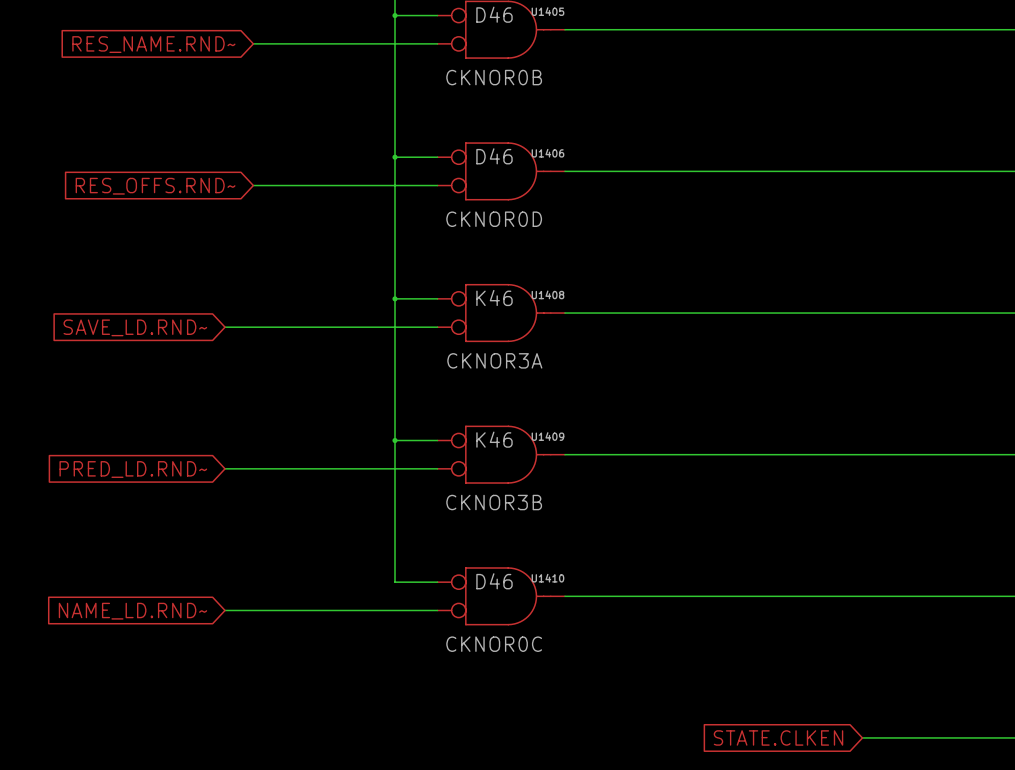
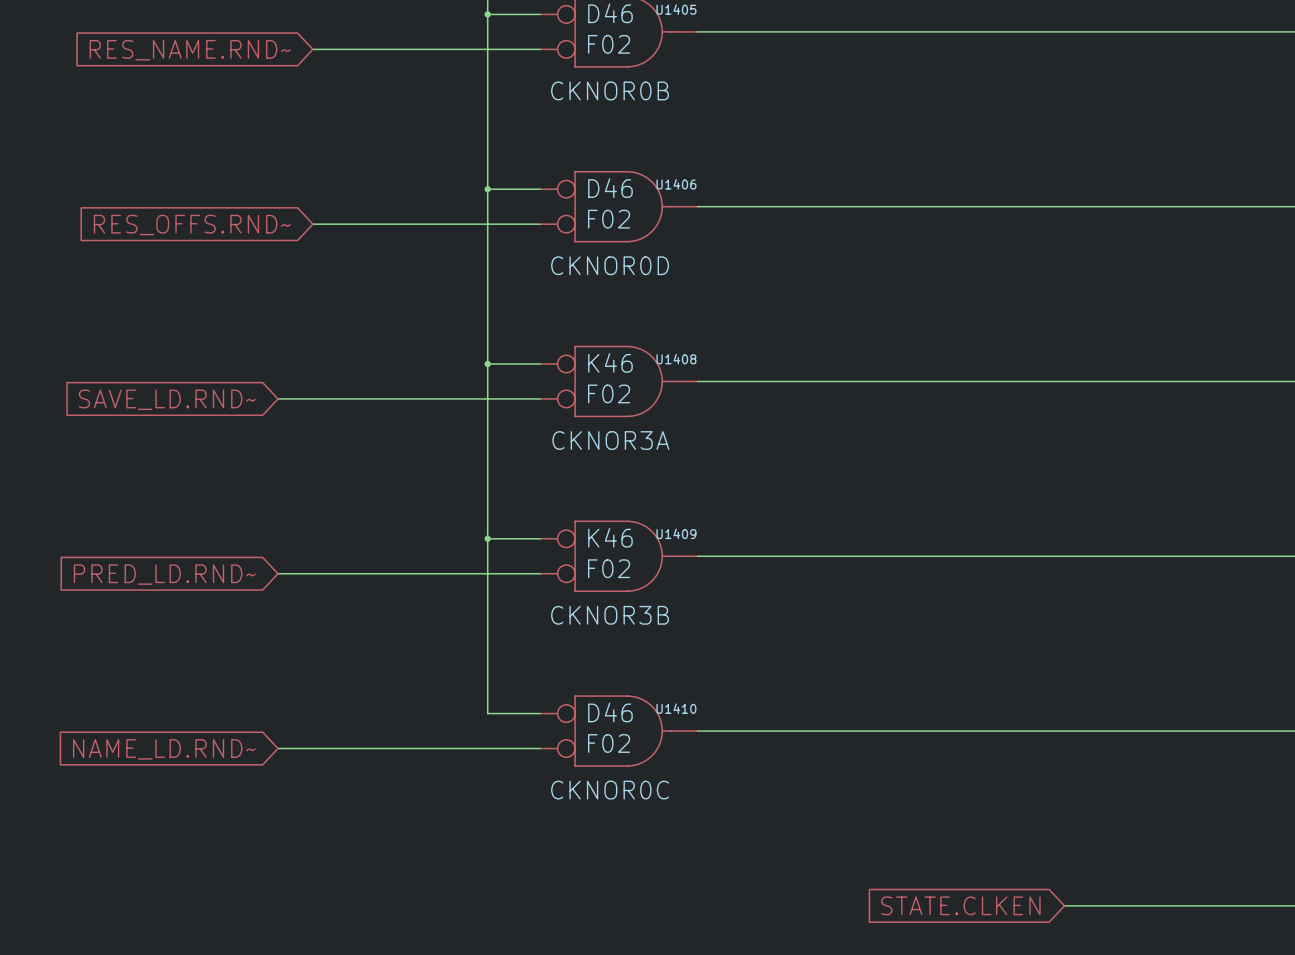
U1405 value: none -> F02 (609, 44)
U1406 value: none -> F02 (609, 219)
U1408 value: none -> F02 (609, 393)
U1409 value: none -> F02 (609, 568)
U1410 value: none -> F02 (609, 743)

